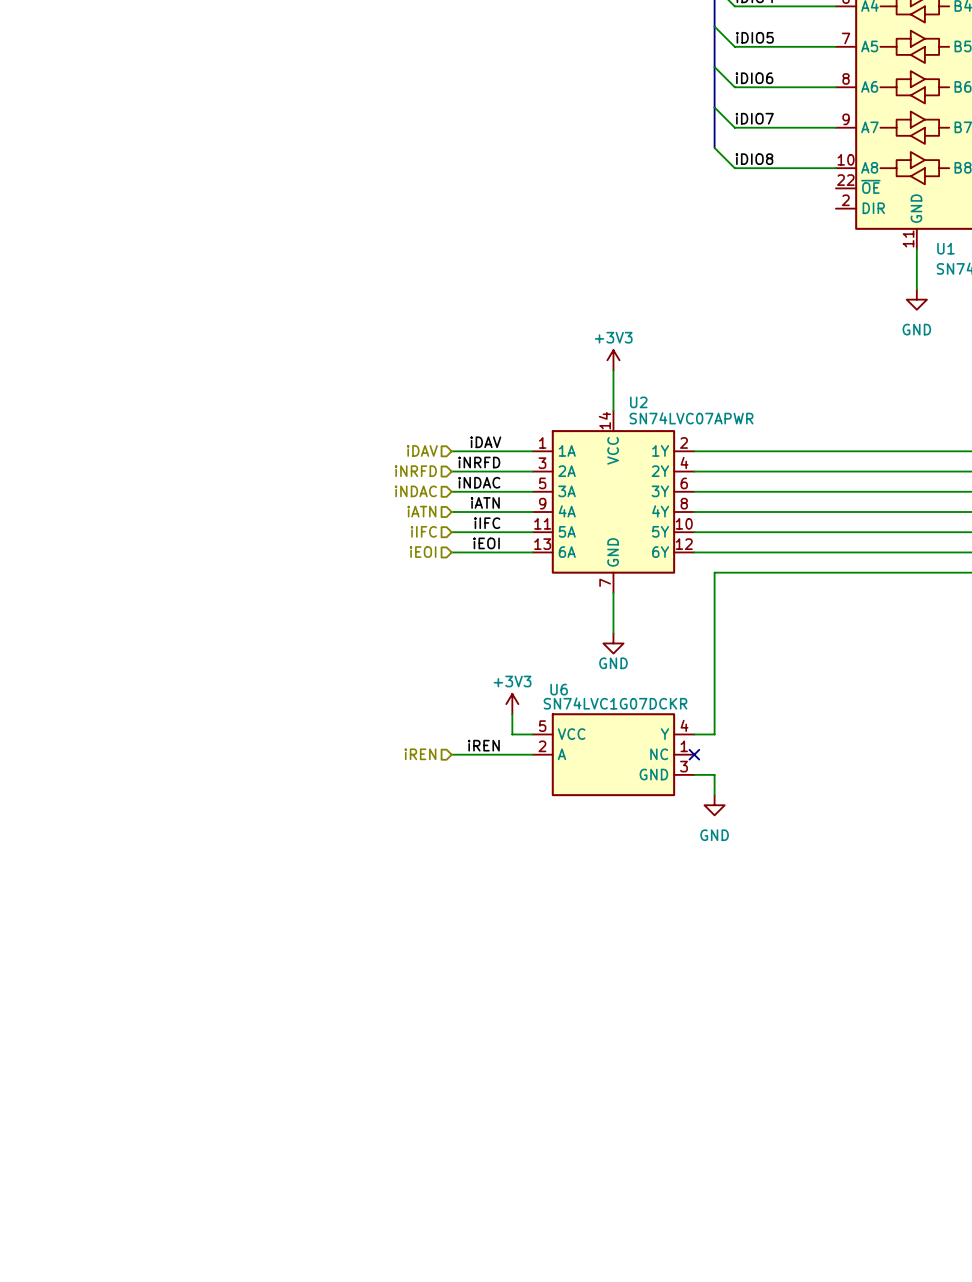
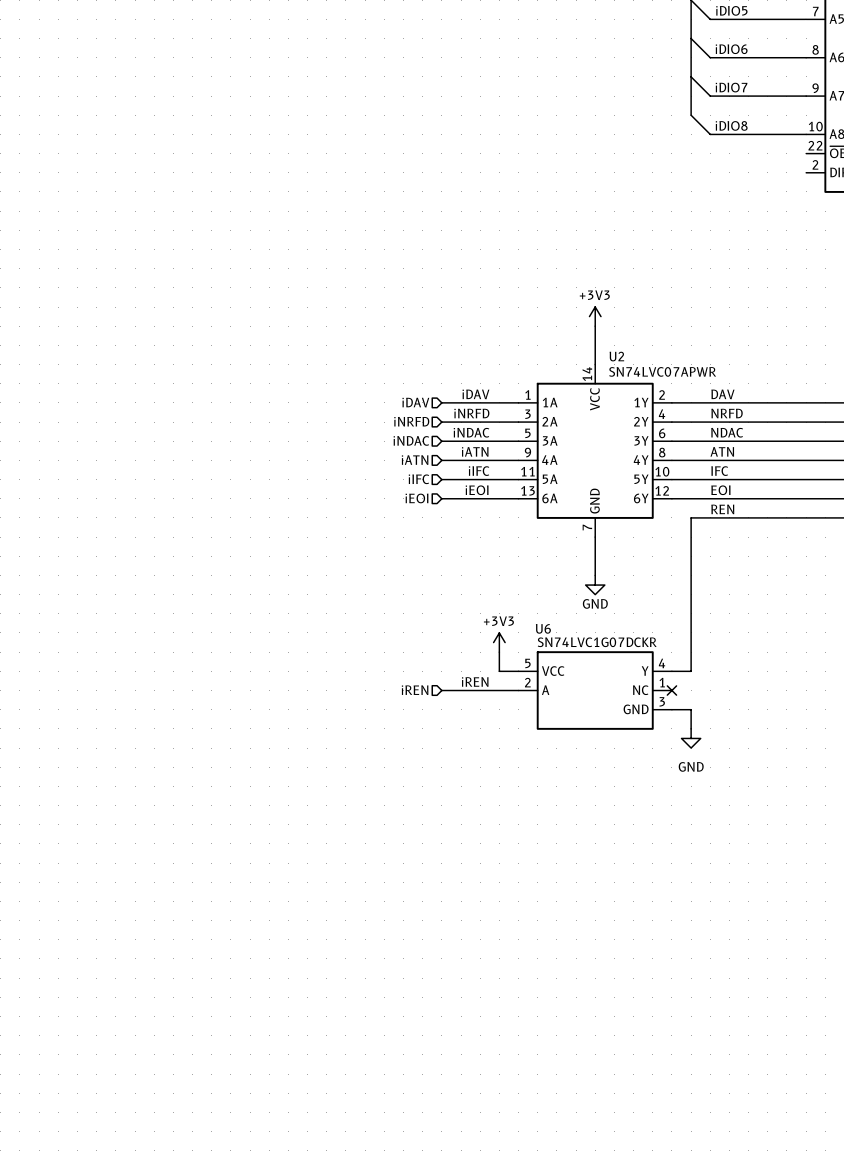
label: none -> DAV (722, 394)
label: none -> NRFD (727, 413)
label: none -> NDAC (727, 432)
label: none -> ATN (722, 451)
label: none -> IFC (719, 471)
label: none -> EOI (720, 490)
label: none -> REN (722, 509)

